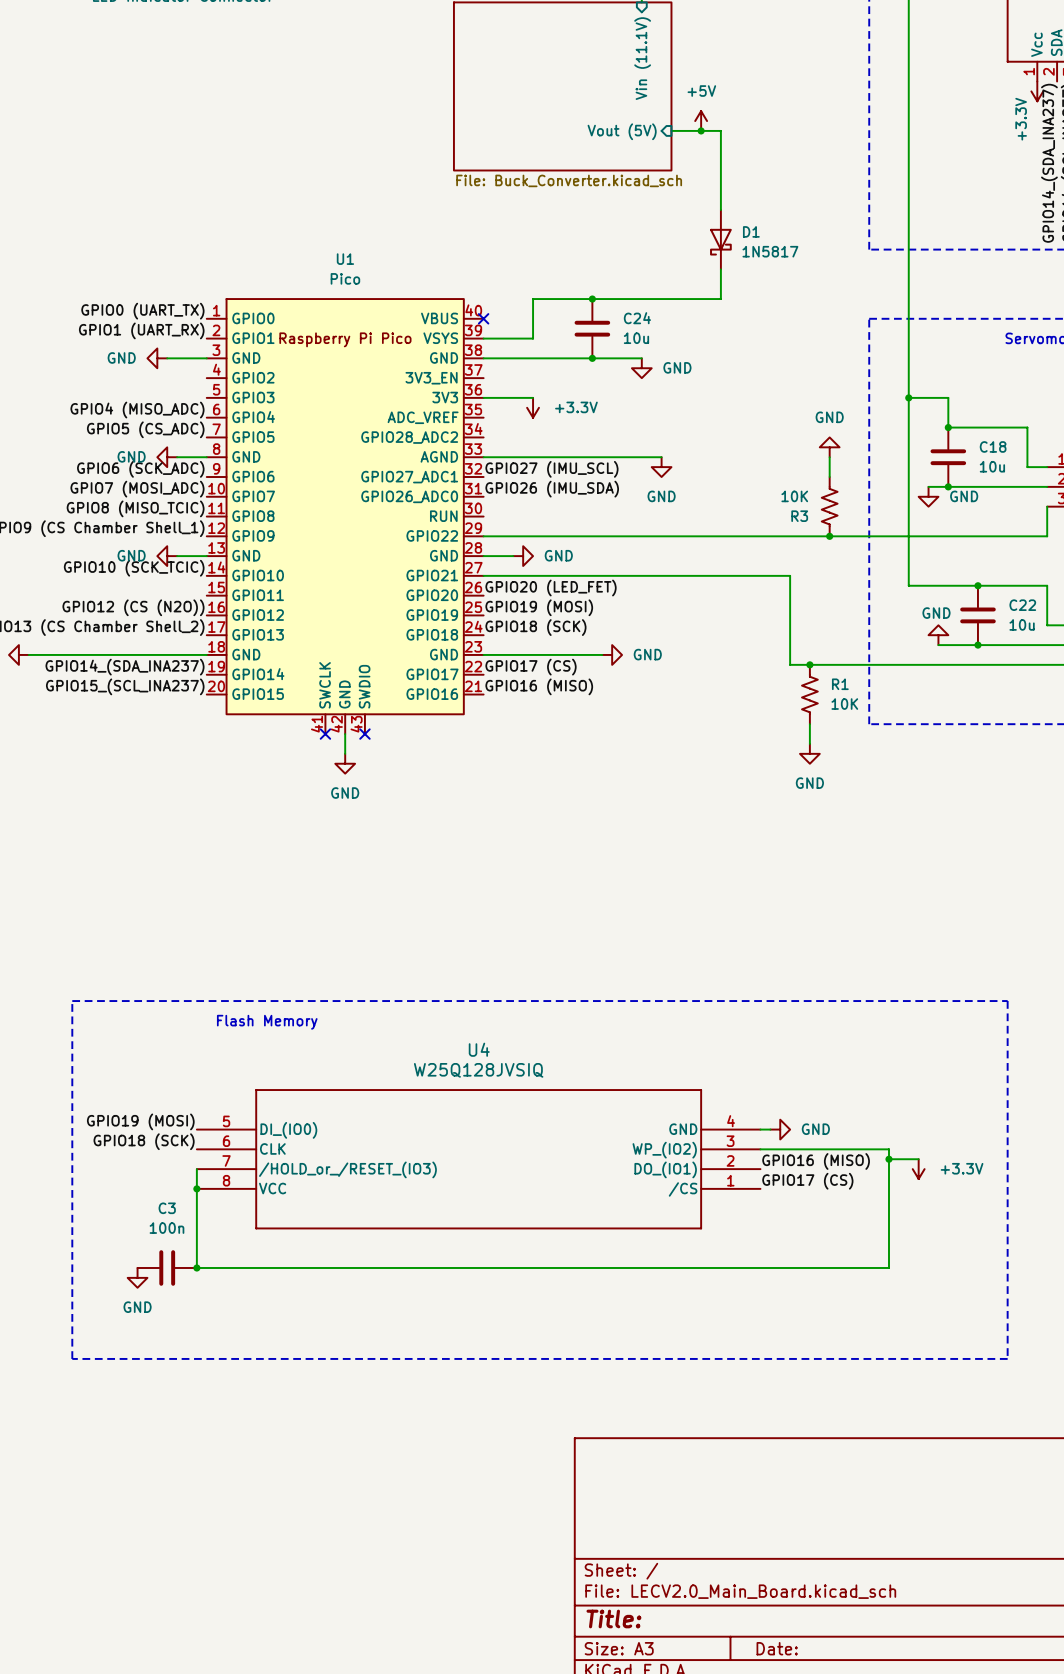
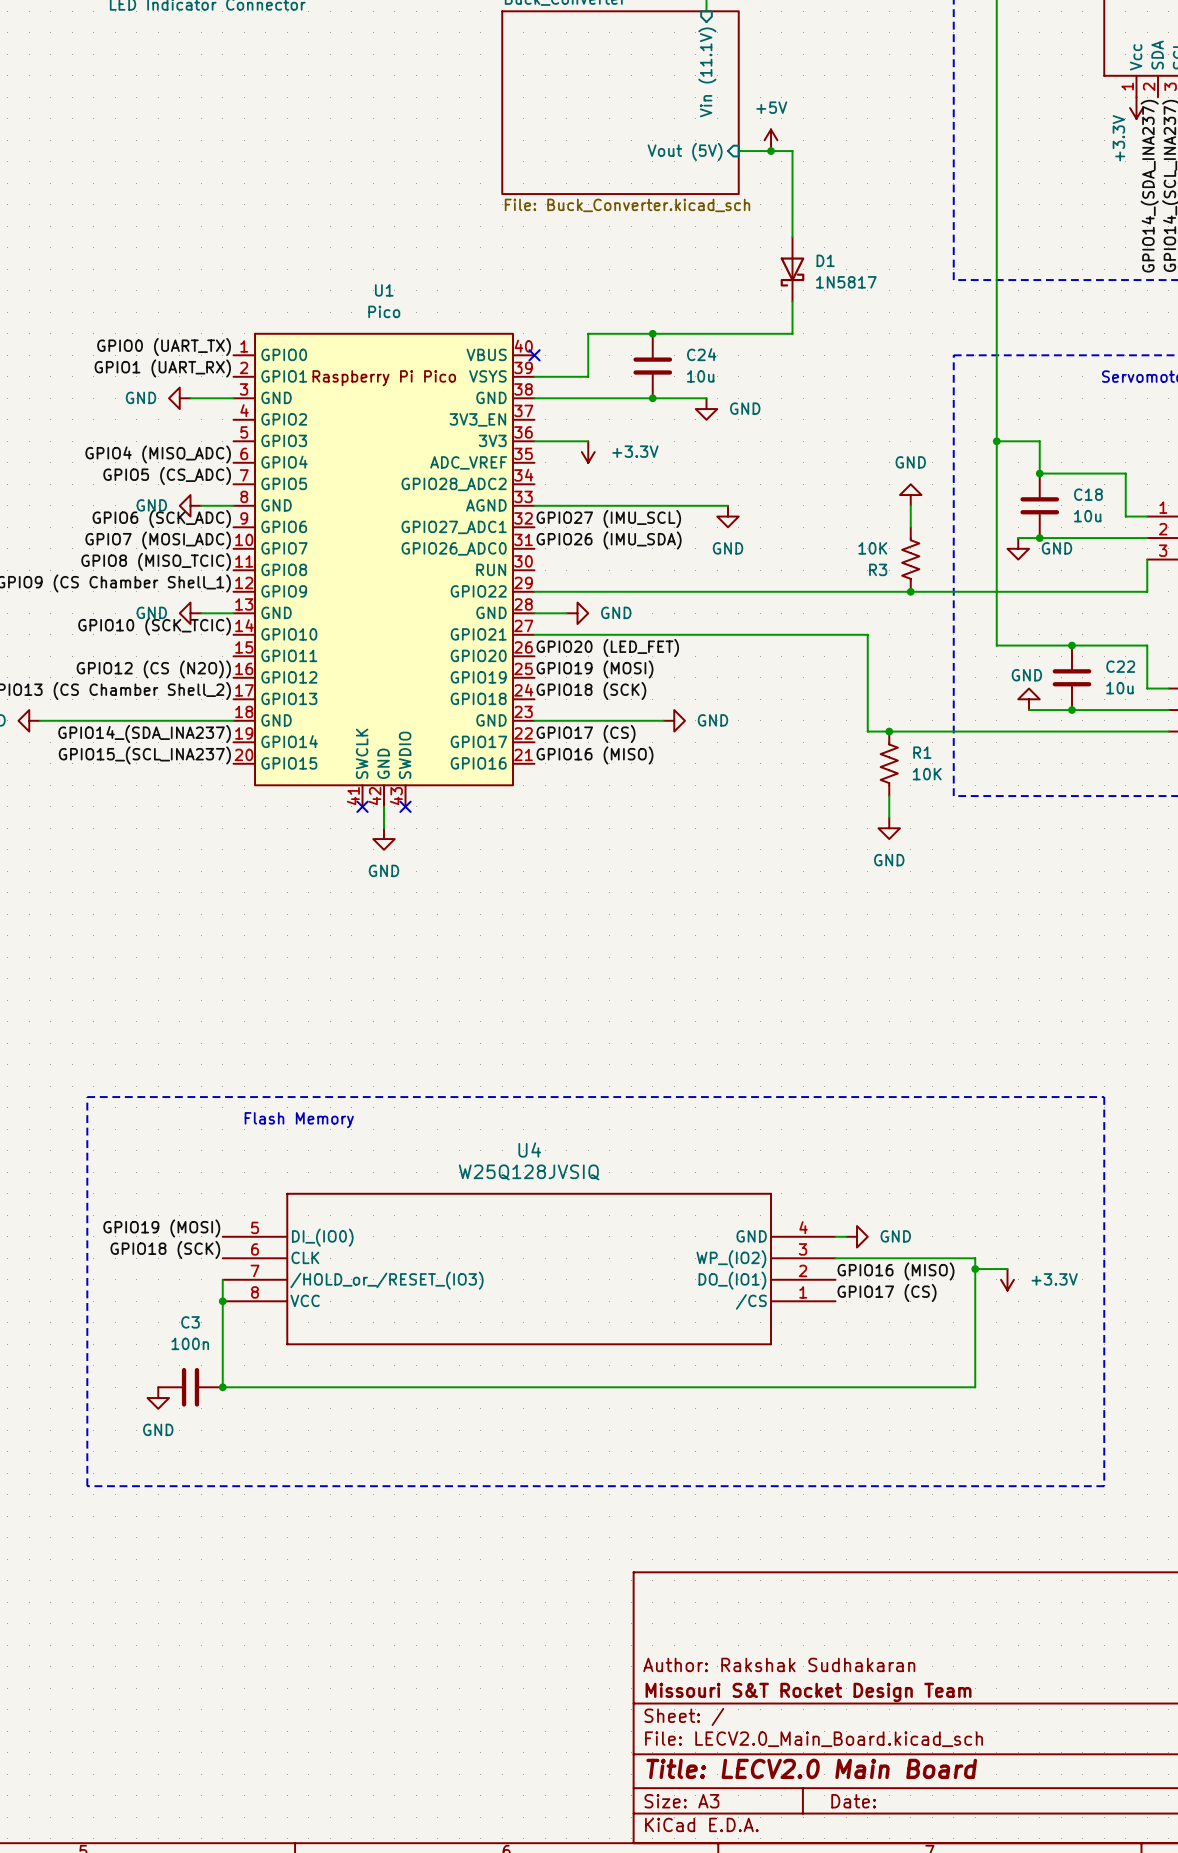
title block: none -> Author: Rakshak Sudhakaran (779, 1664)
title block: none -> Missouri S&T Rocket Design Team (808, 1692)
title block: Title: (613, 1618) -> Title: LECV2.0 Main Board (811, 1768)

